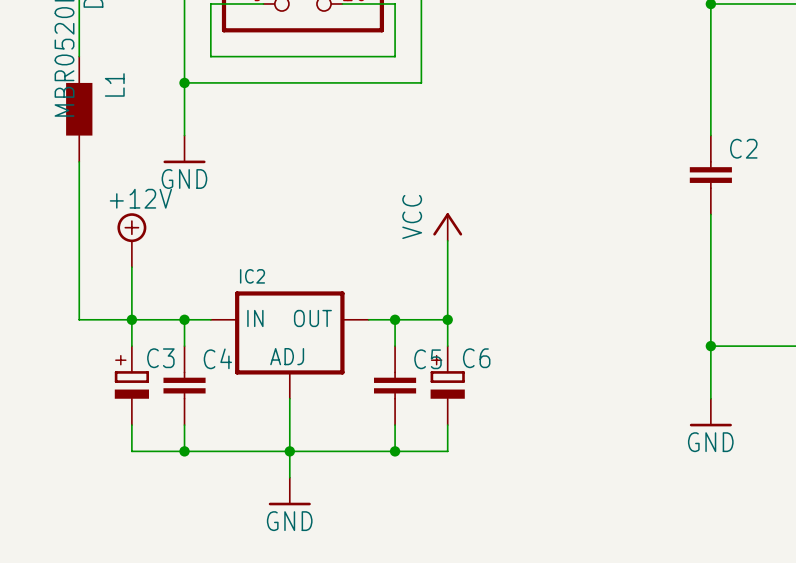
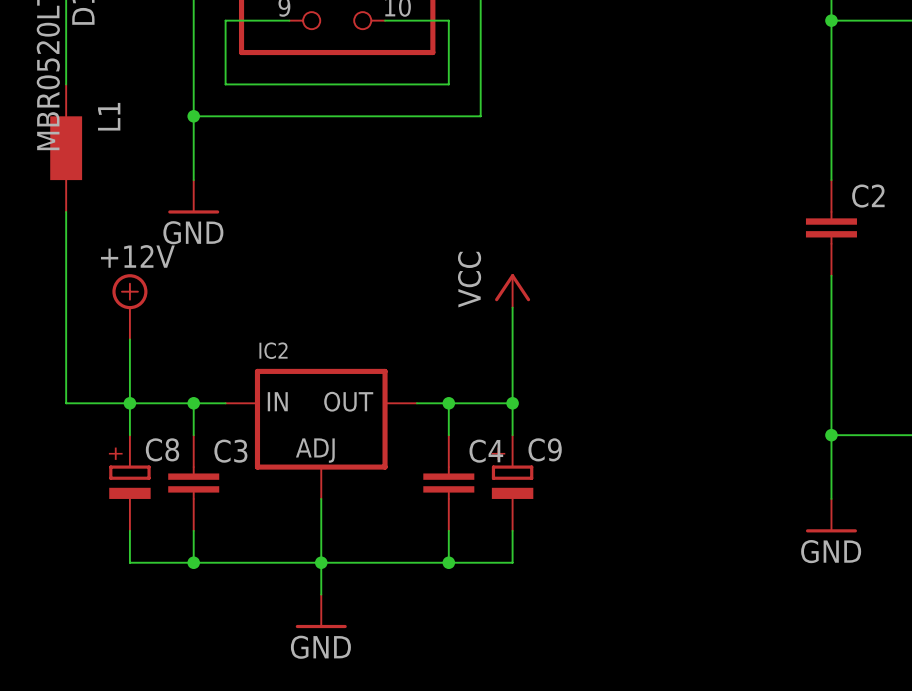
C3 name: C3 (160, 358) -> C8 (162, 449)
C4 name: C4 (217, 358) -> C3 (230, 451)
C6 name: C6 (476, 358) -> C9 (545, 449)
C5 name: C5 (428, 359) -> C4 (486, 451)

